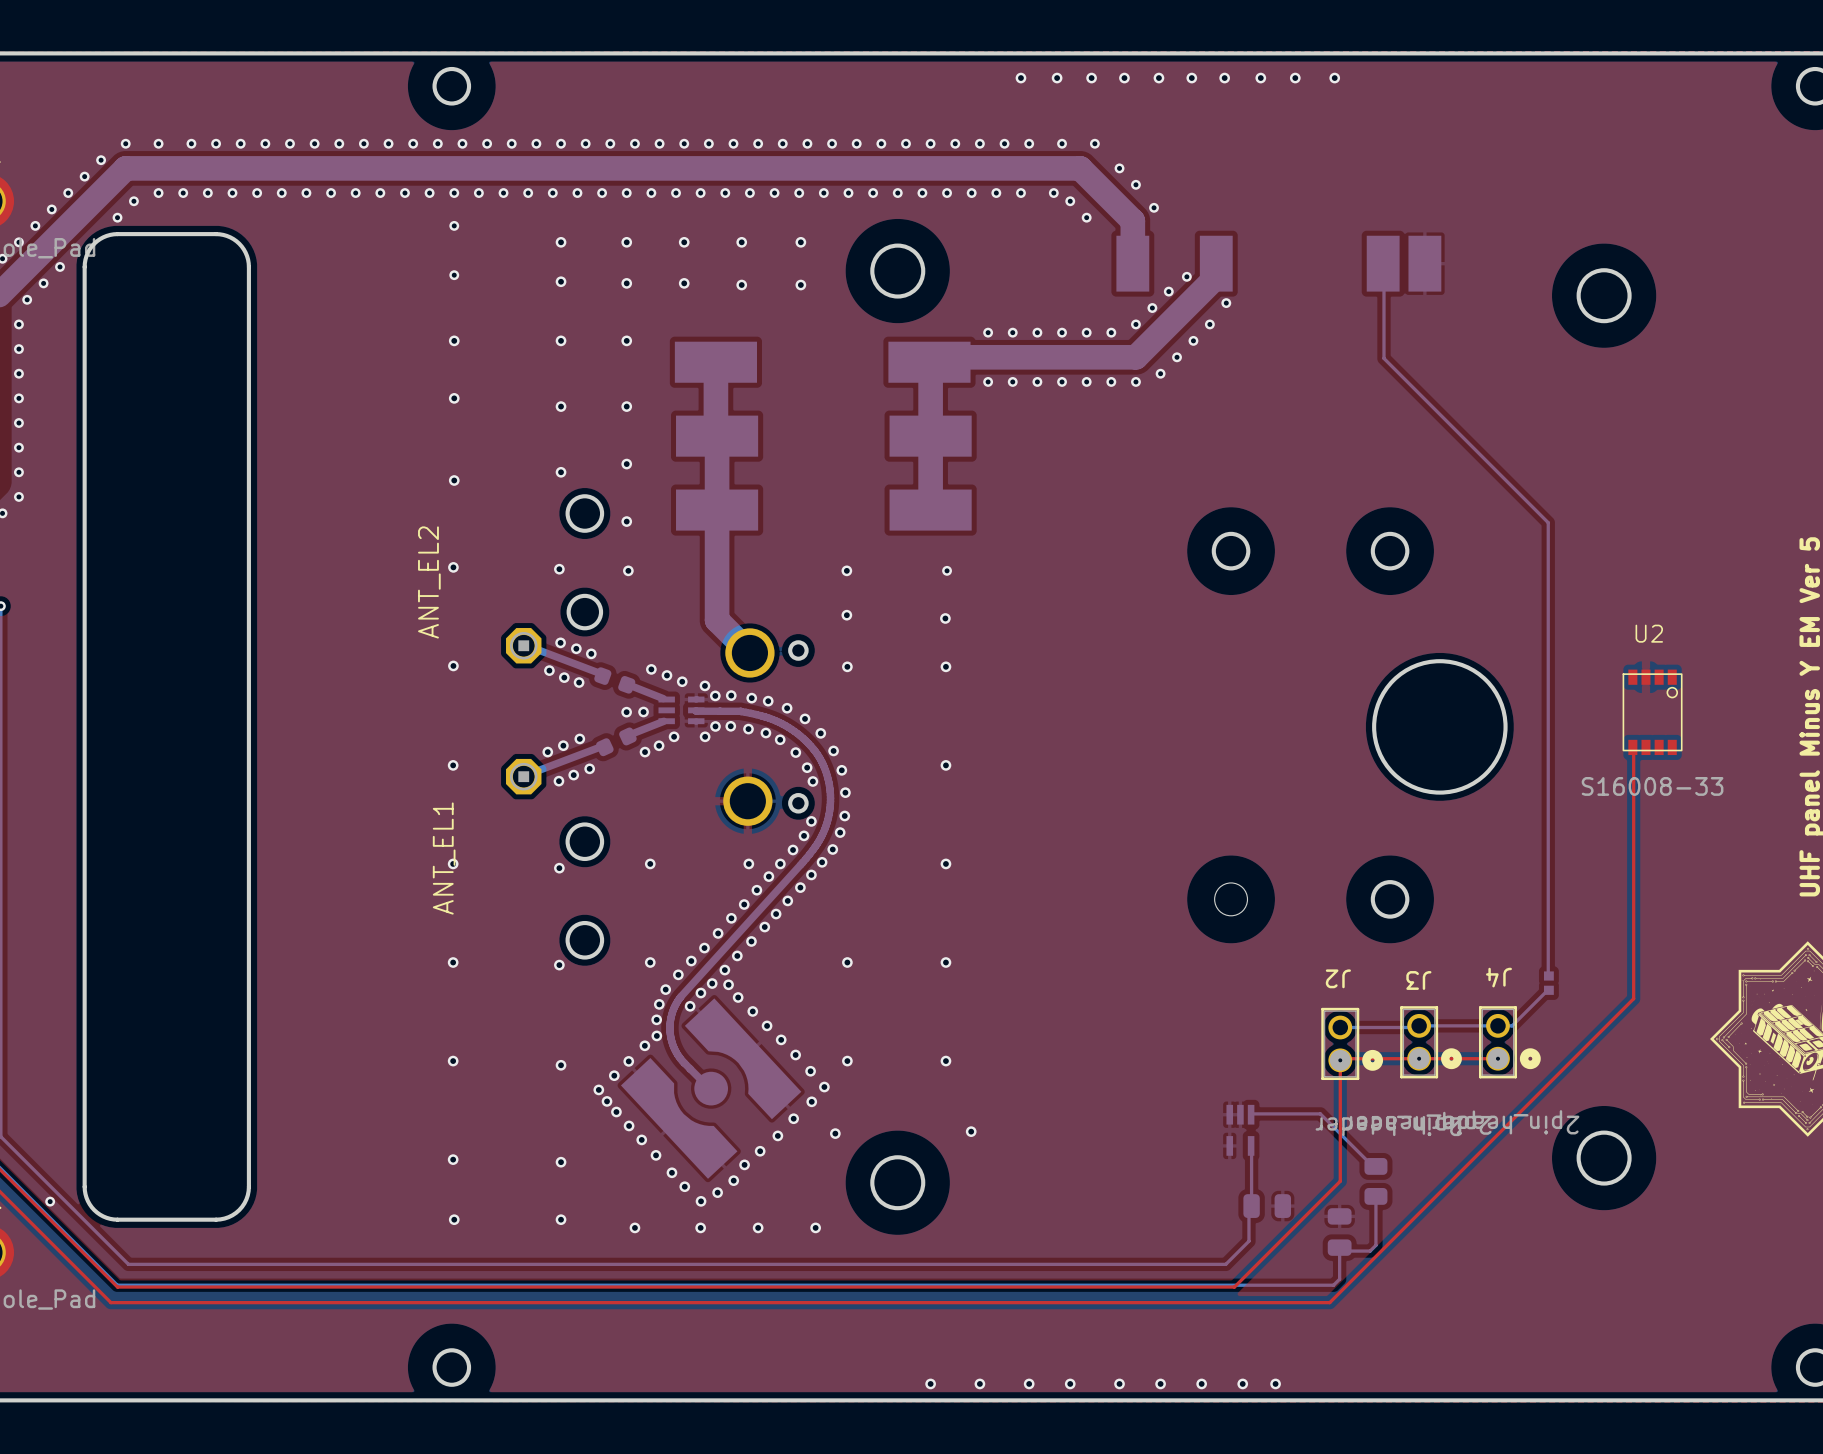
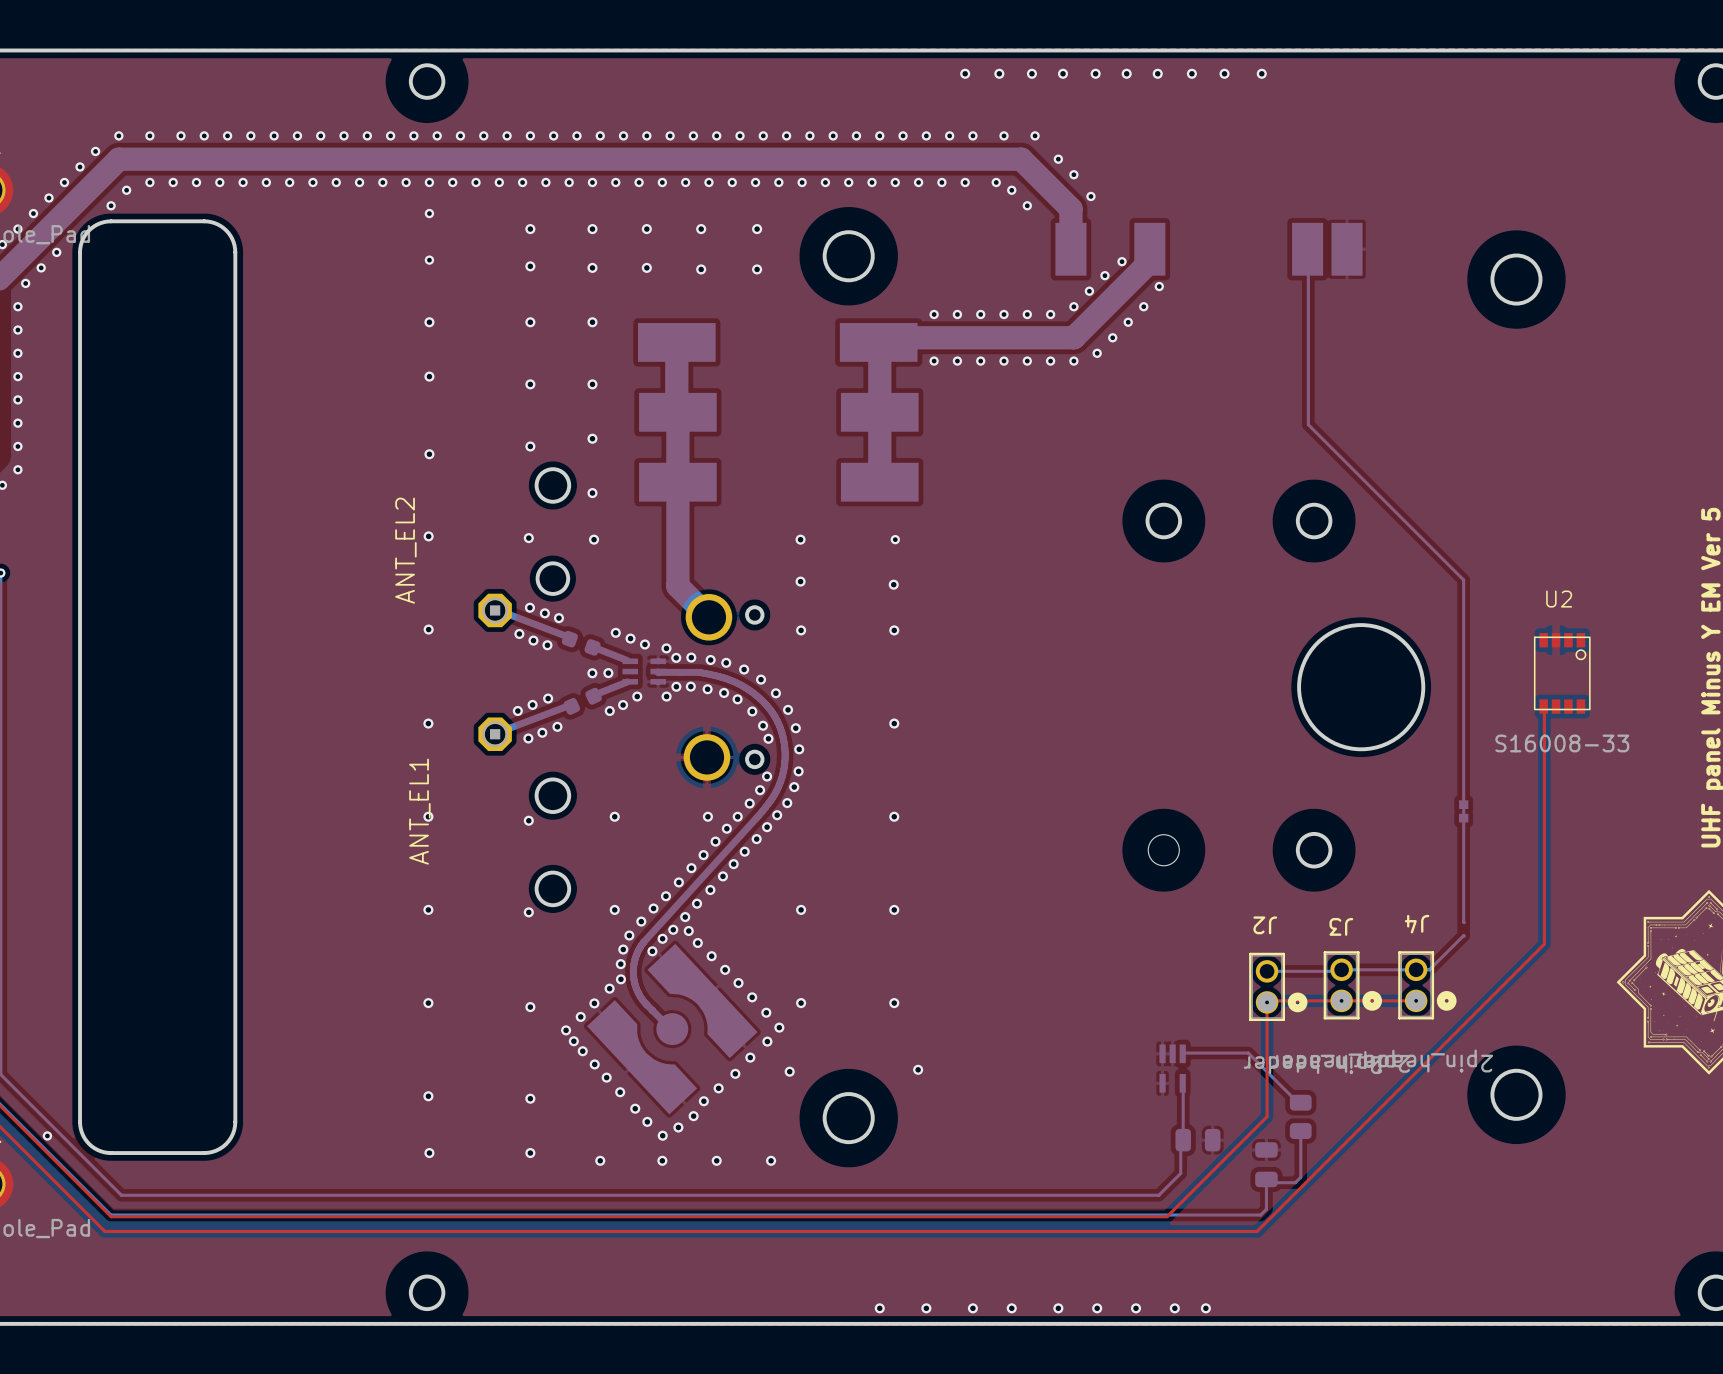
bottom track: (1383, 358) (1548, 522) (1548, 613) -> (1308, 338) (1308, 424) (1463, 580)
part position: (1548, 983) -> (1463, 811)

